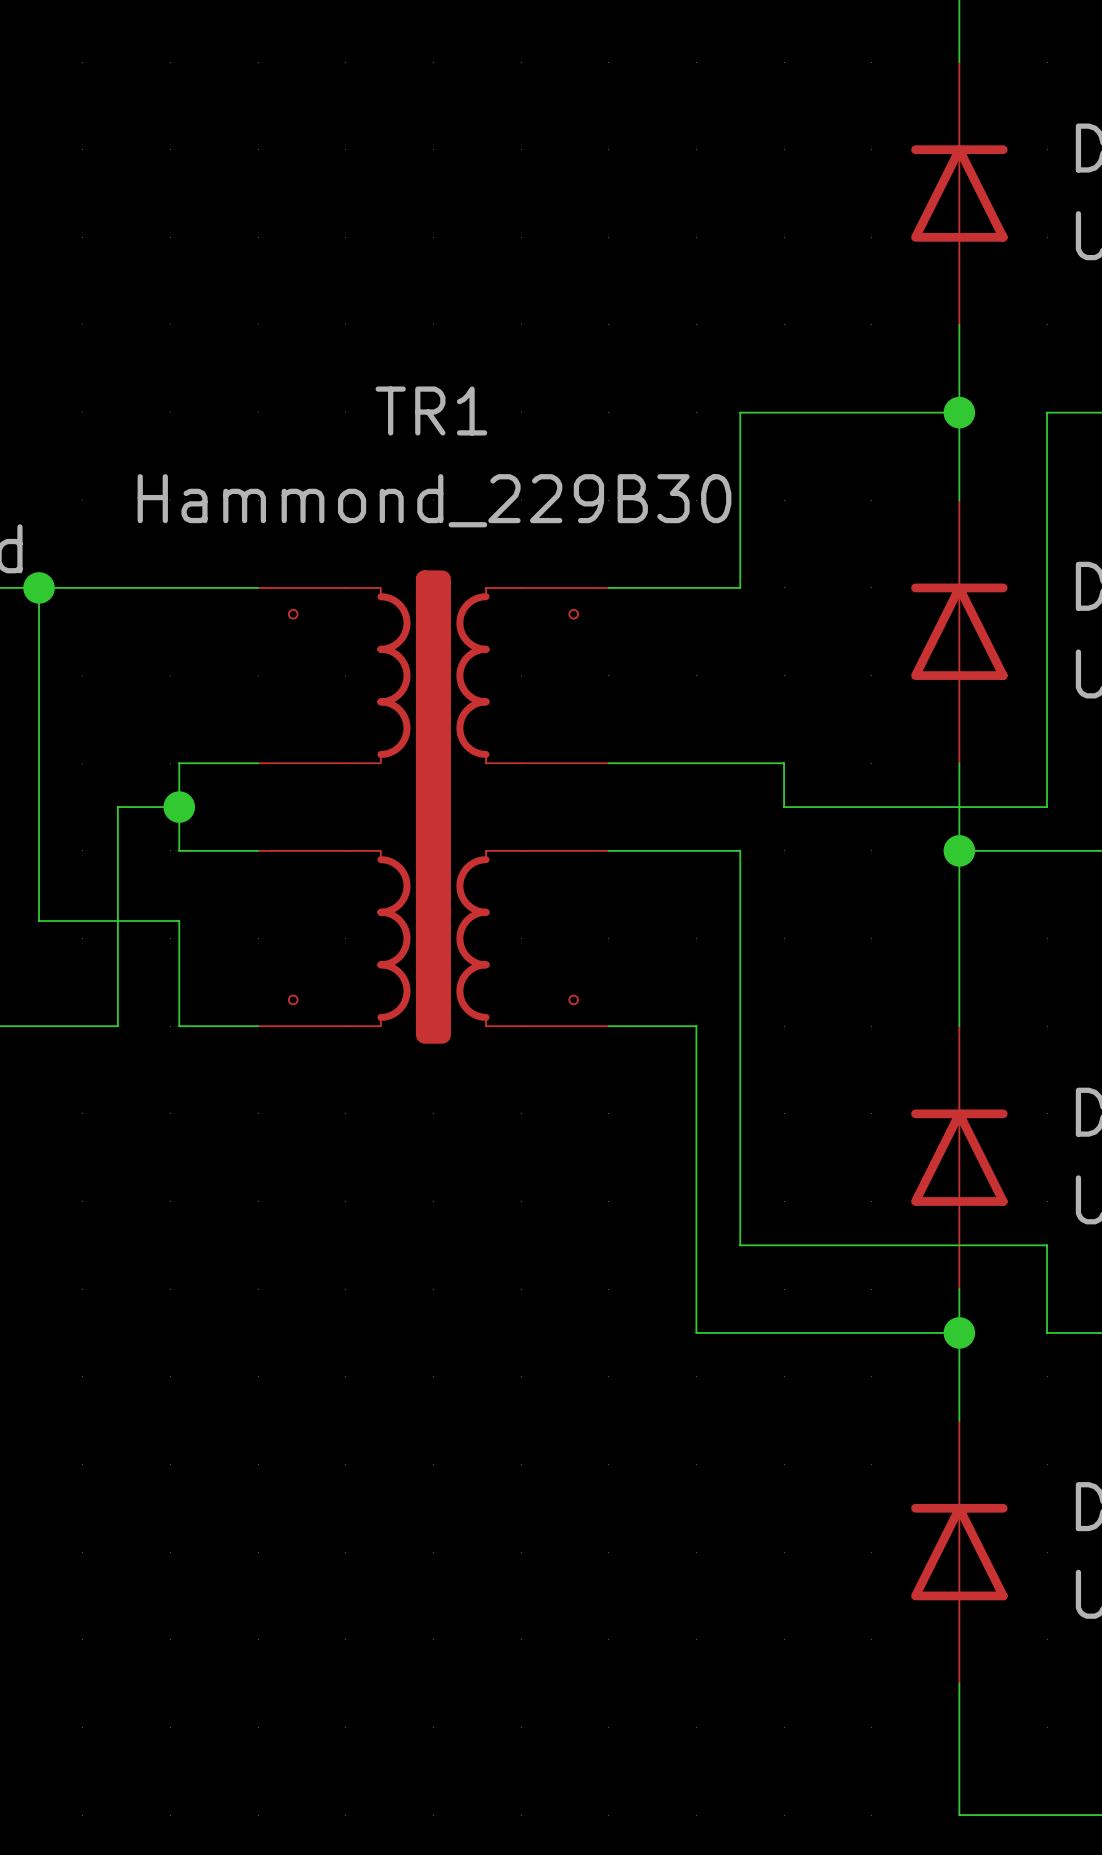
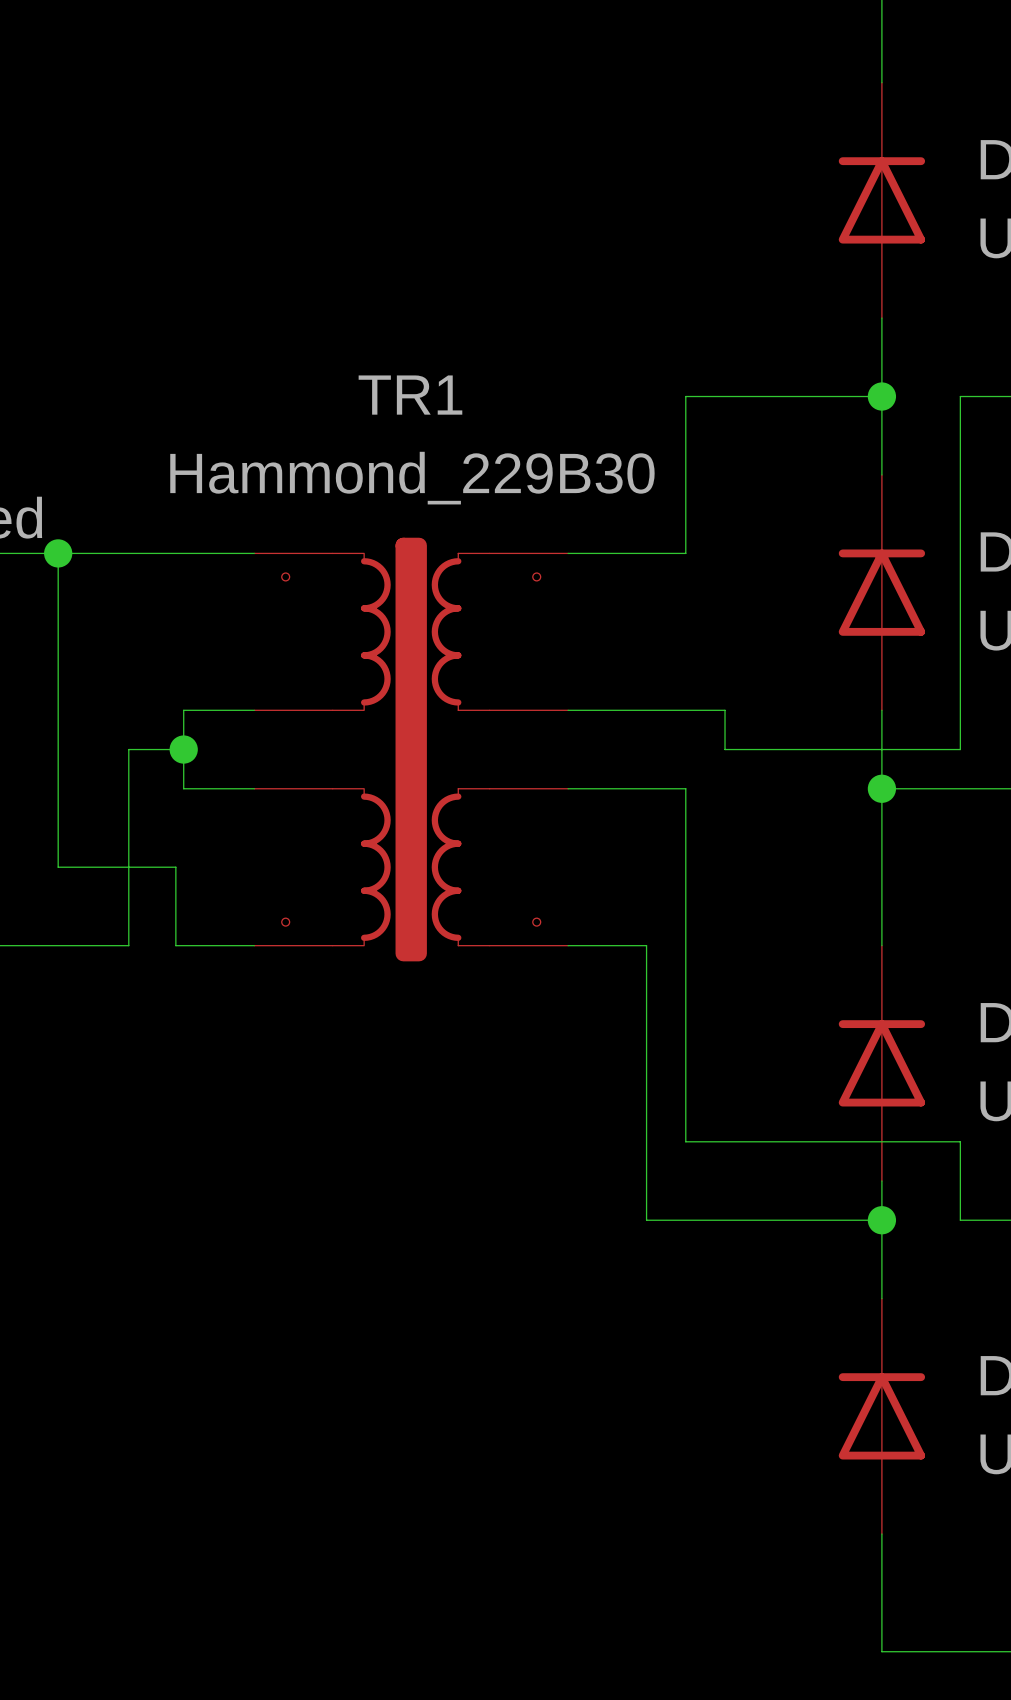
wire: (39, 921) (179, 921) (179, 1026) -> (58, 851) (58, 867) (175, 867) (175, 945) (183, 945)

